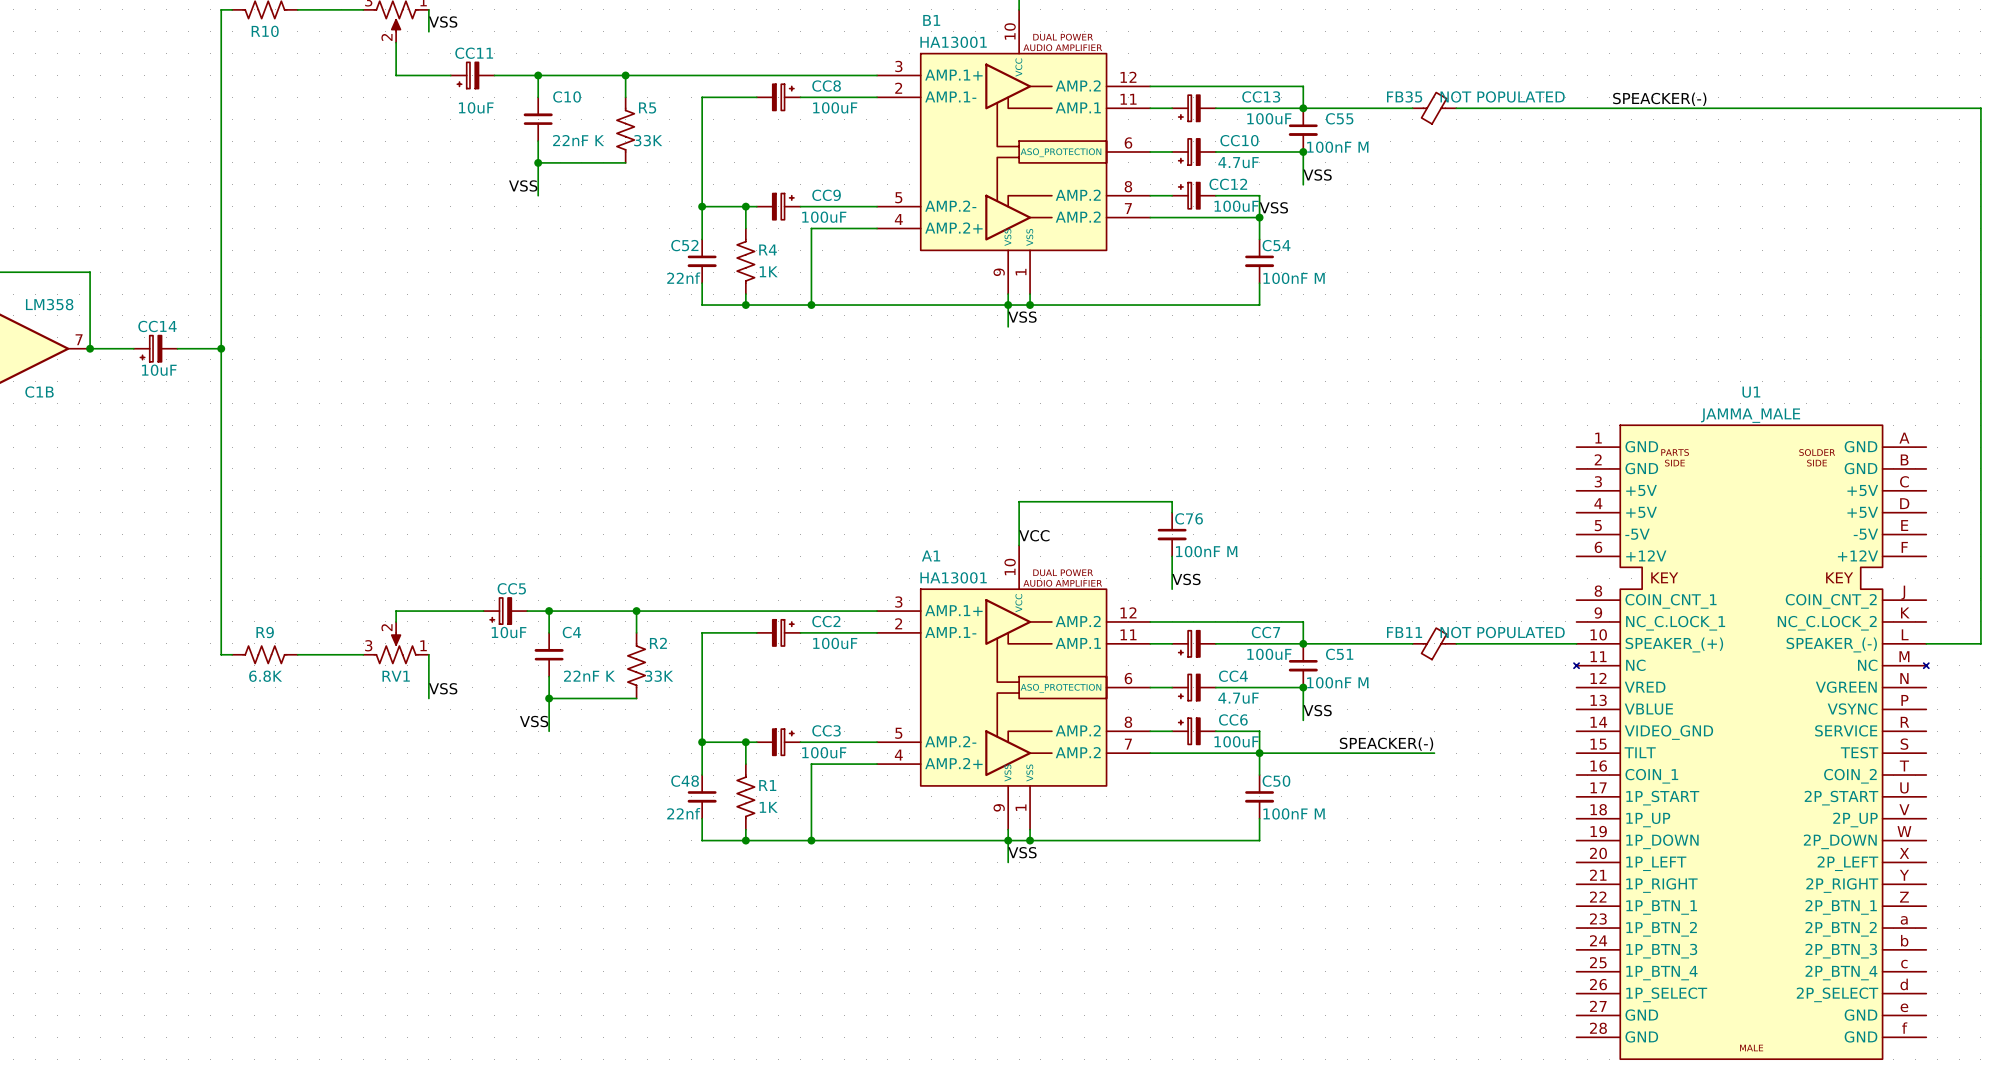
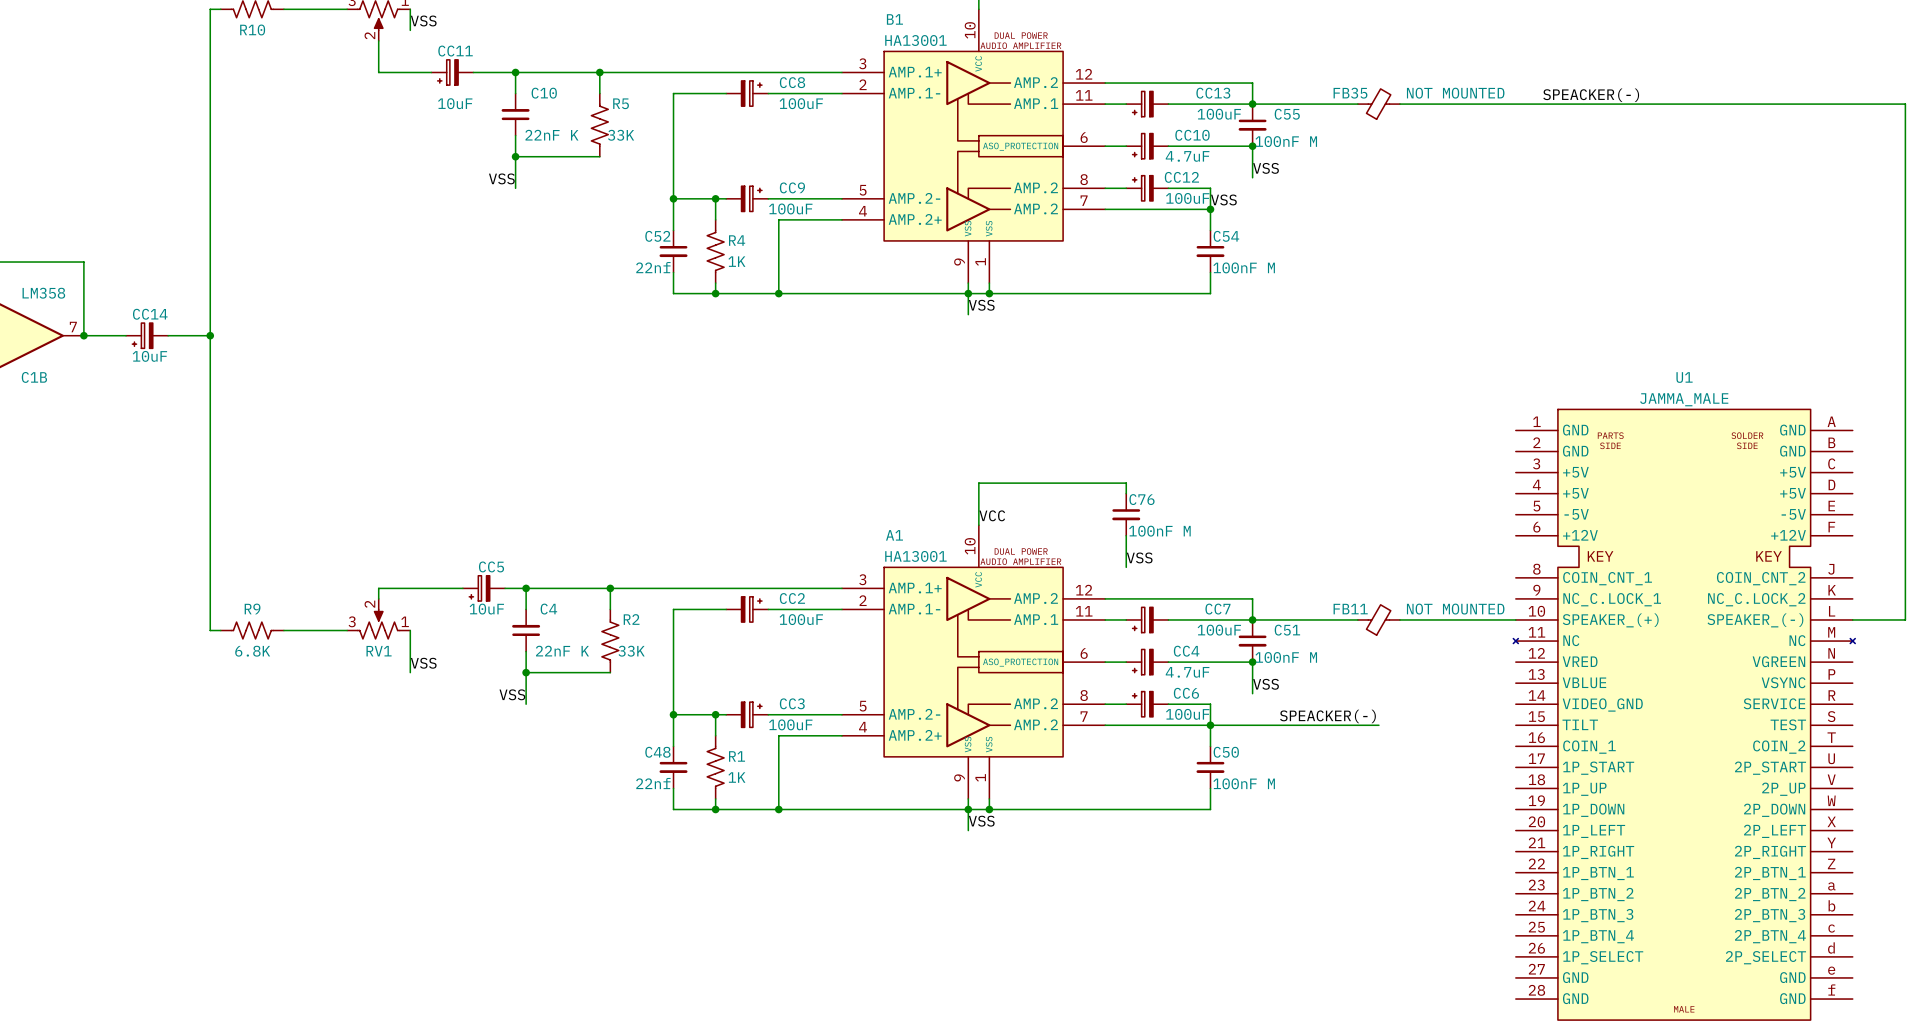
FB35 value: NOT POPULATED (1502, 96) -> NOT MOUNTED (1455, 93)
FB11 value: NOT POPULATED (1502, 632) -> NOT MOUNTED (1455, 609)

